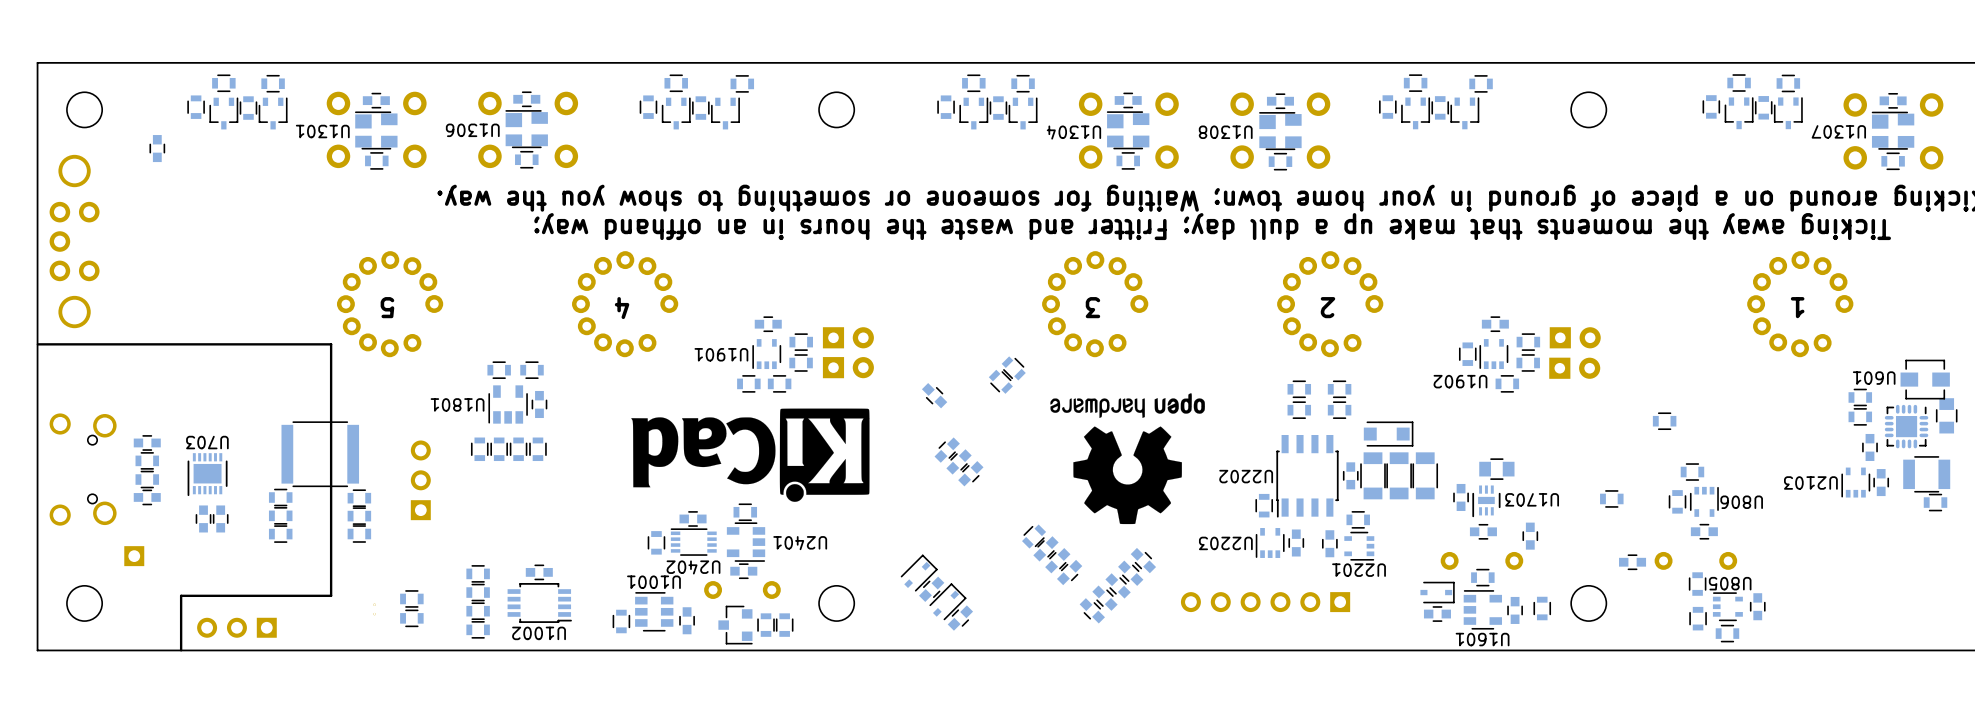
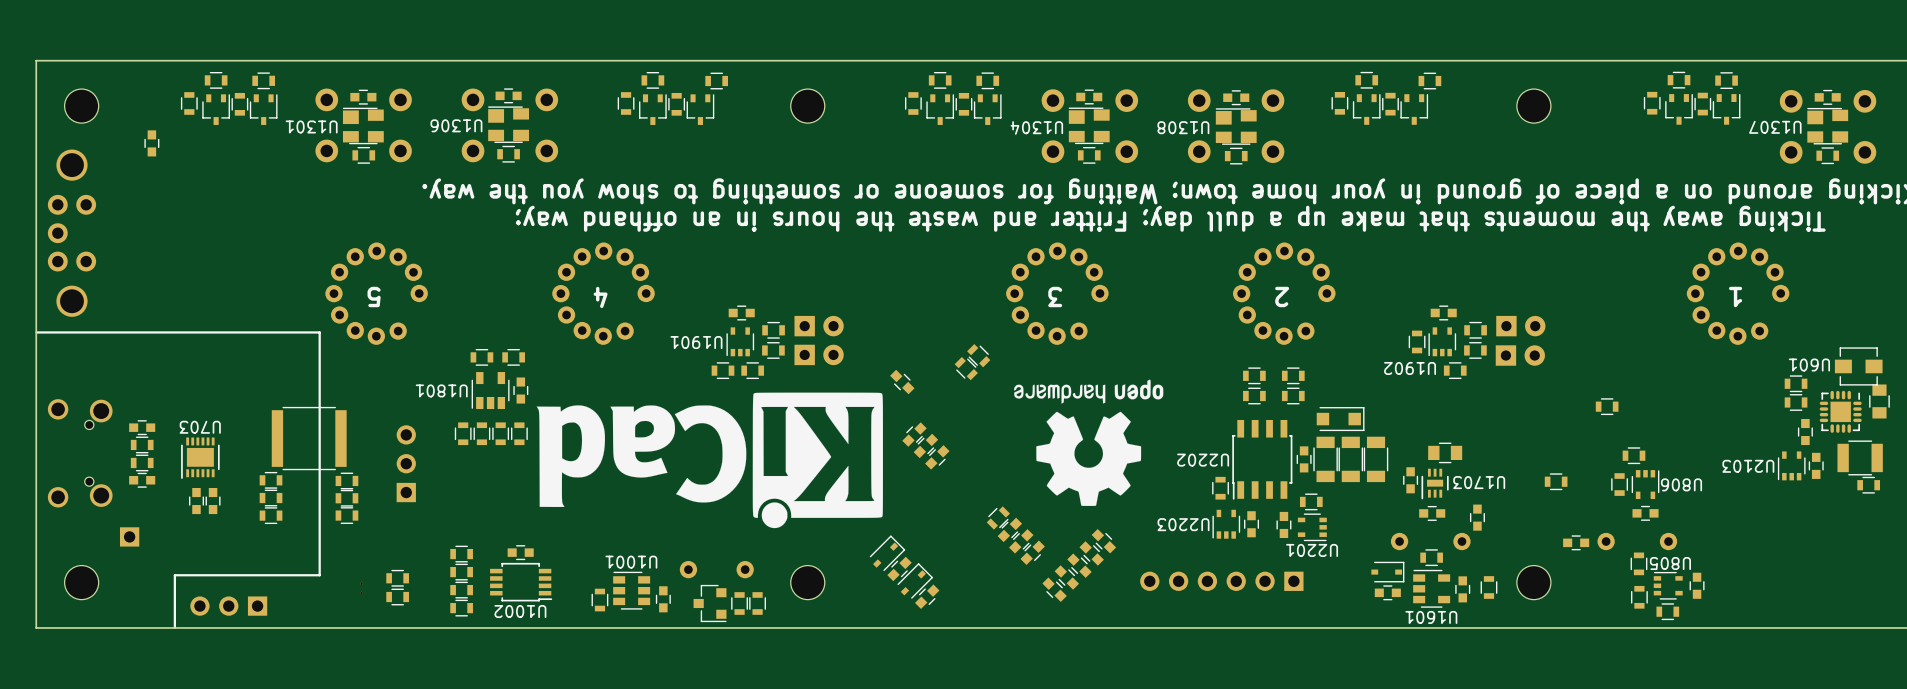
drawing: none -> [536, 392, 883, 529]
drawing: [631, 408, 870, 502] -> none
part: (745, 512) -> none
part: (693, 518) -> none
part: (656, 542) -> none
U2402: (693, 542) -> none
U2401: (746, 542) -> none
part: (743, 571) -> none

